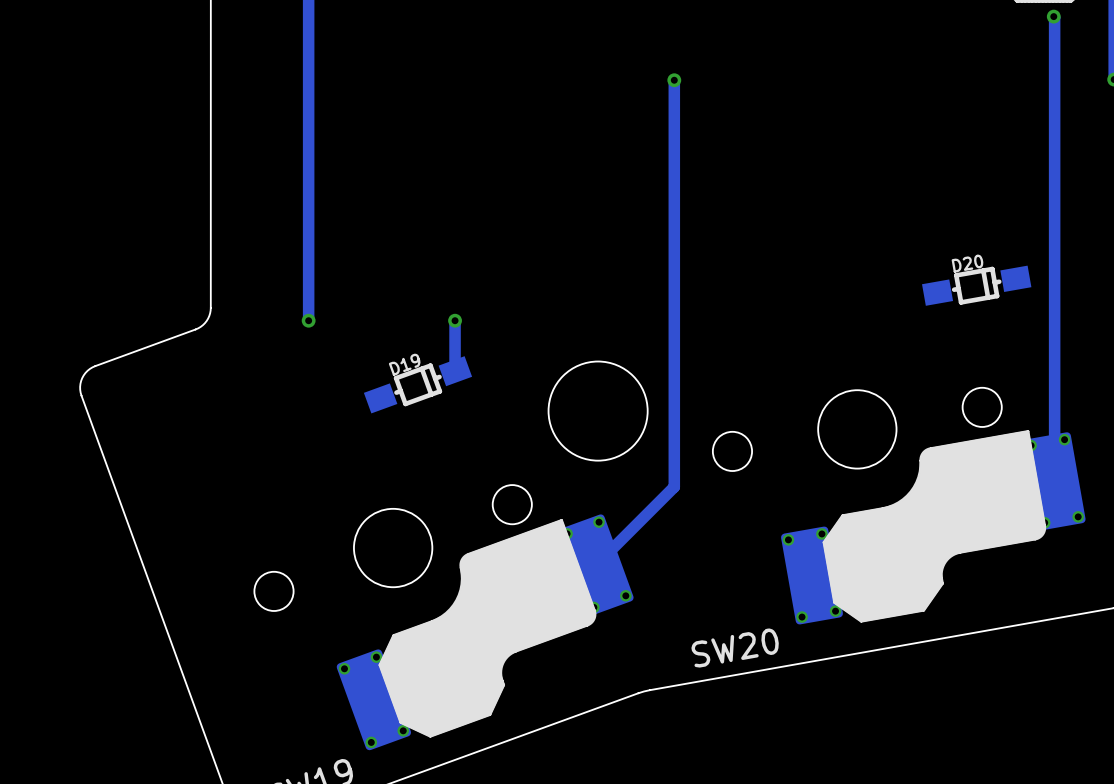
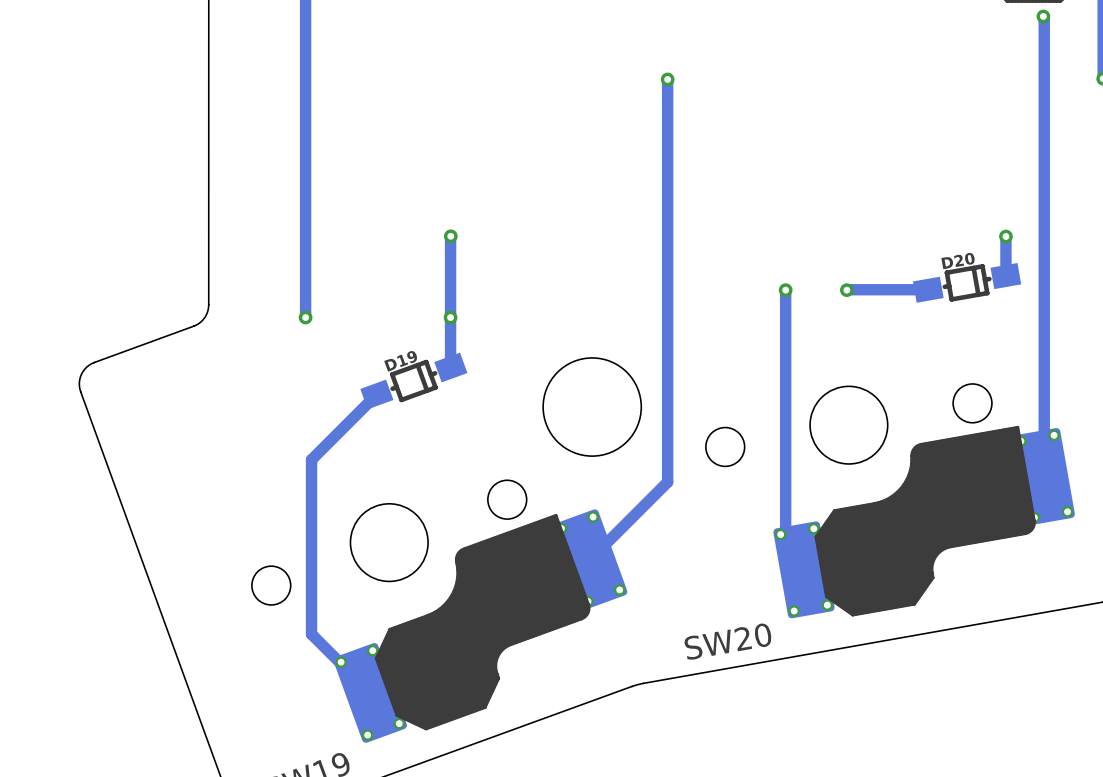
track: none -> (450, 236) (450, 317)
via: none -> (450, 236)
track: none -> (1005, 236) (1005, 275)
via: none -> (1005, 236)
track: none -> (928, 289) (846, 290)
track: none -> (785, 290) (785, 551) (803, 569)
via: none -> (785, 290)
via: none -> (846, 290)
track: none -> (376, 394) (311, 459) (311, 634) (370, 692)

